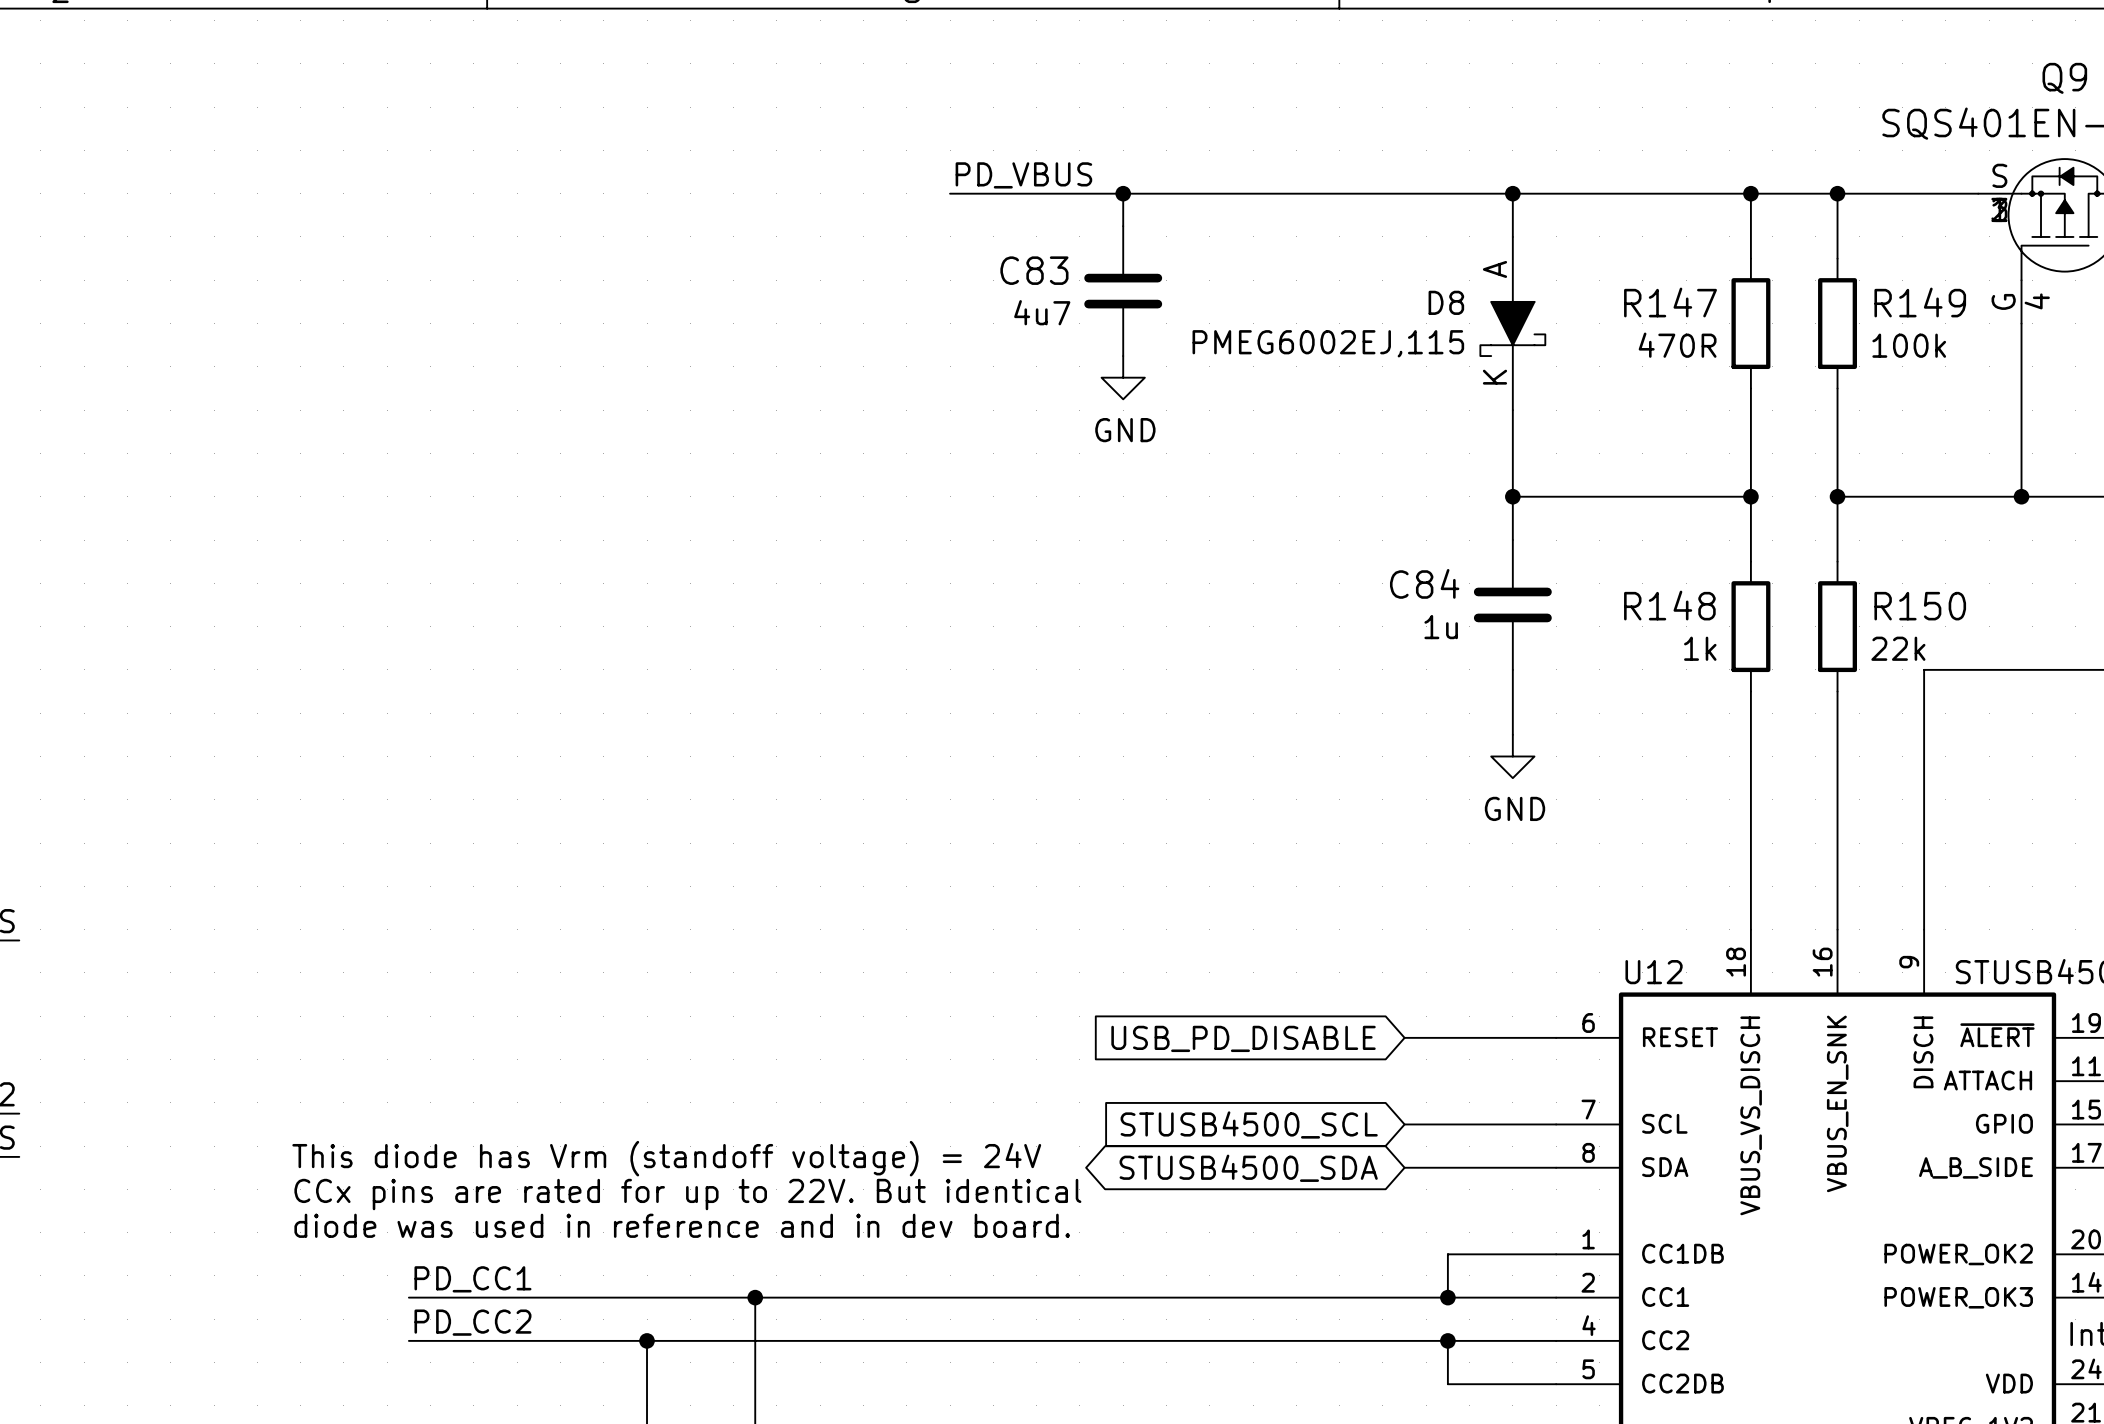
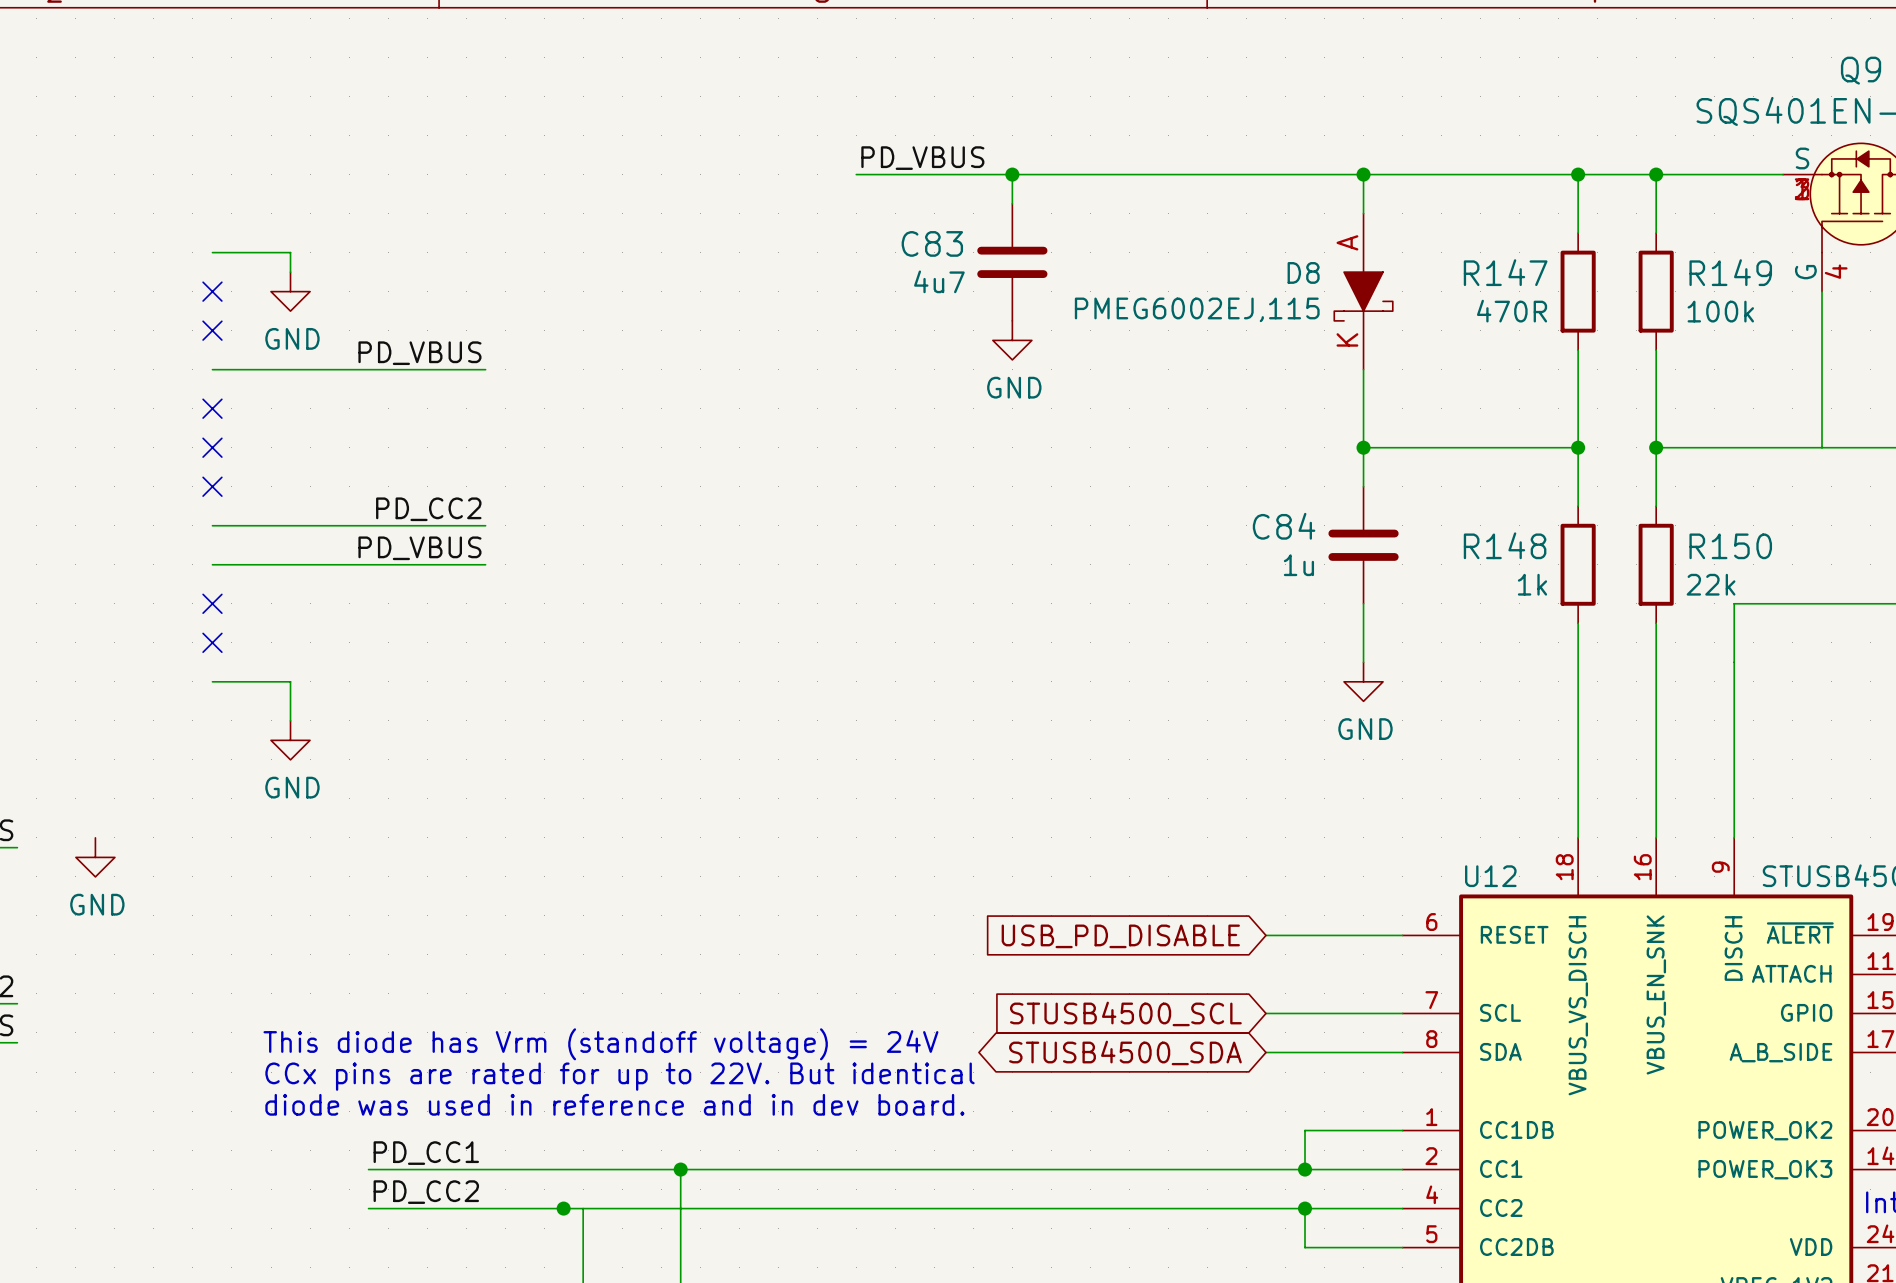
wire: none -> (212, 252) (290, 252) (290, 272)
no-connect mark: none -> (212, 291)
power symbol: none -> GND (290, 291)
no-connect mark: none -> (212, 330)
label: none -> PD_VBUS (419, 353)
wire: none -> (212, 369) (485, 369)
no-connect mark: none -> (212, 408)
no-connect mark: none -> (212, 447)
junction: (2021, 496) -> none
no-connect mark: none -> (212, 486)
label: none -> PD_CC2 (428, 509)
wire: none -> (212, 525) (485, 525)
label: none -> PD_VBUS (419, 548)
wire: none -> (212, 564) (485, 564)
no-connect mark: none -> (212, 603)
no-connect mark: none -> (212, 642)
wire: none -> (212, 681) (290, 681) (290, 720)
power symbol: none -> GND (290, 740)
power symbol: none -> GND (95, 857)
junction position: (647, 1340) -> (563, 1208)

